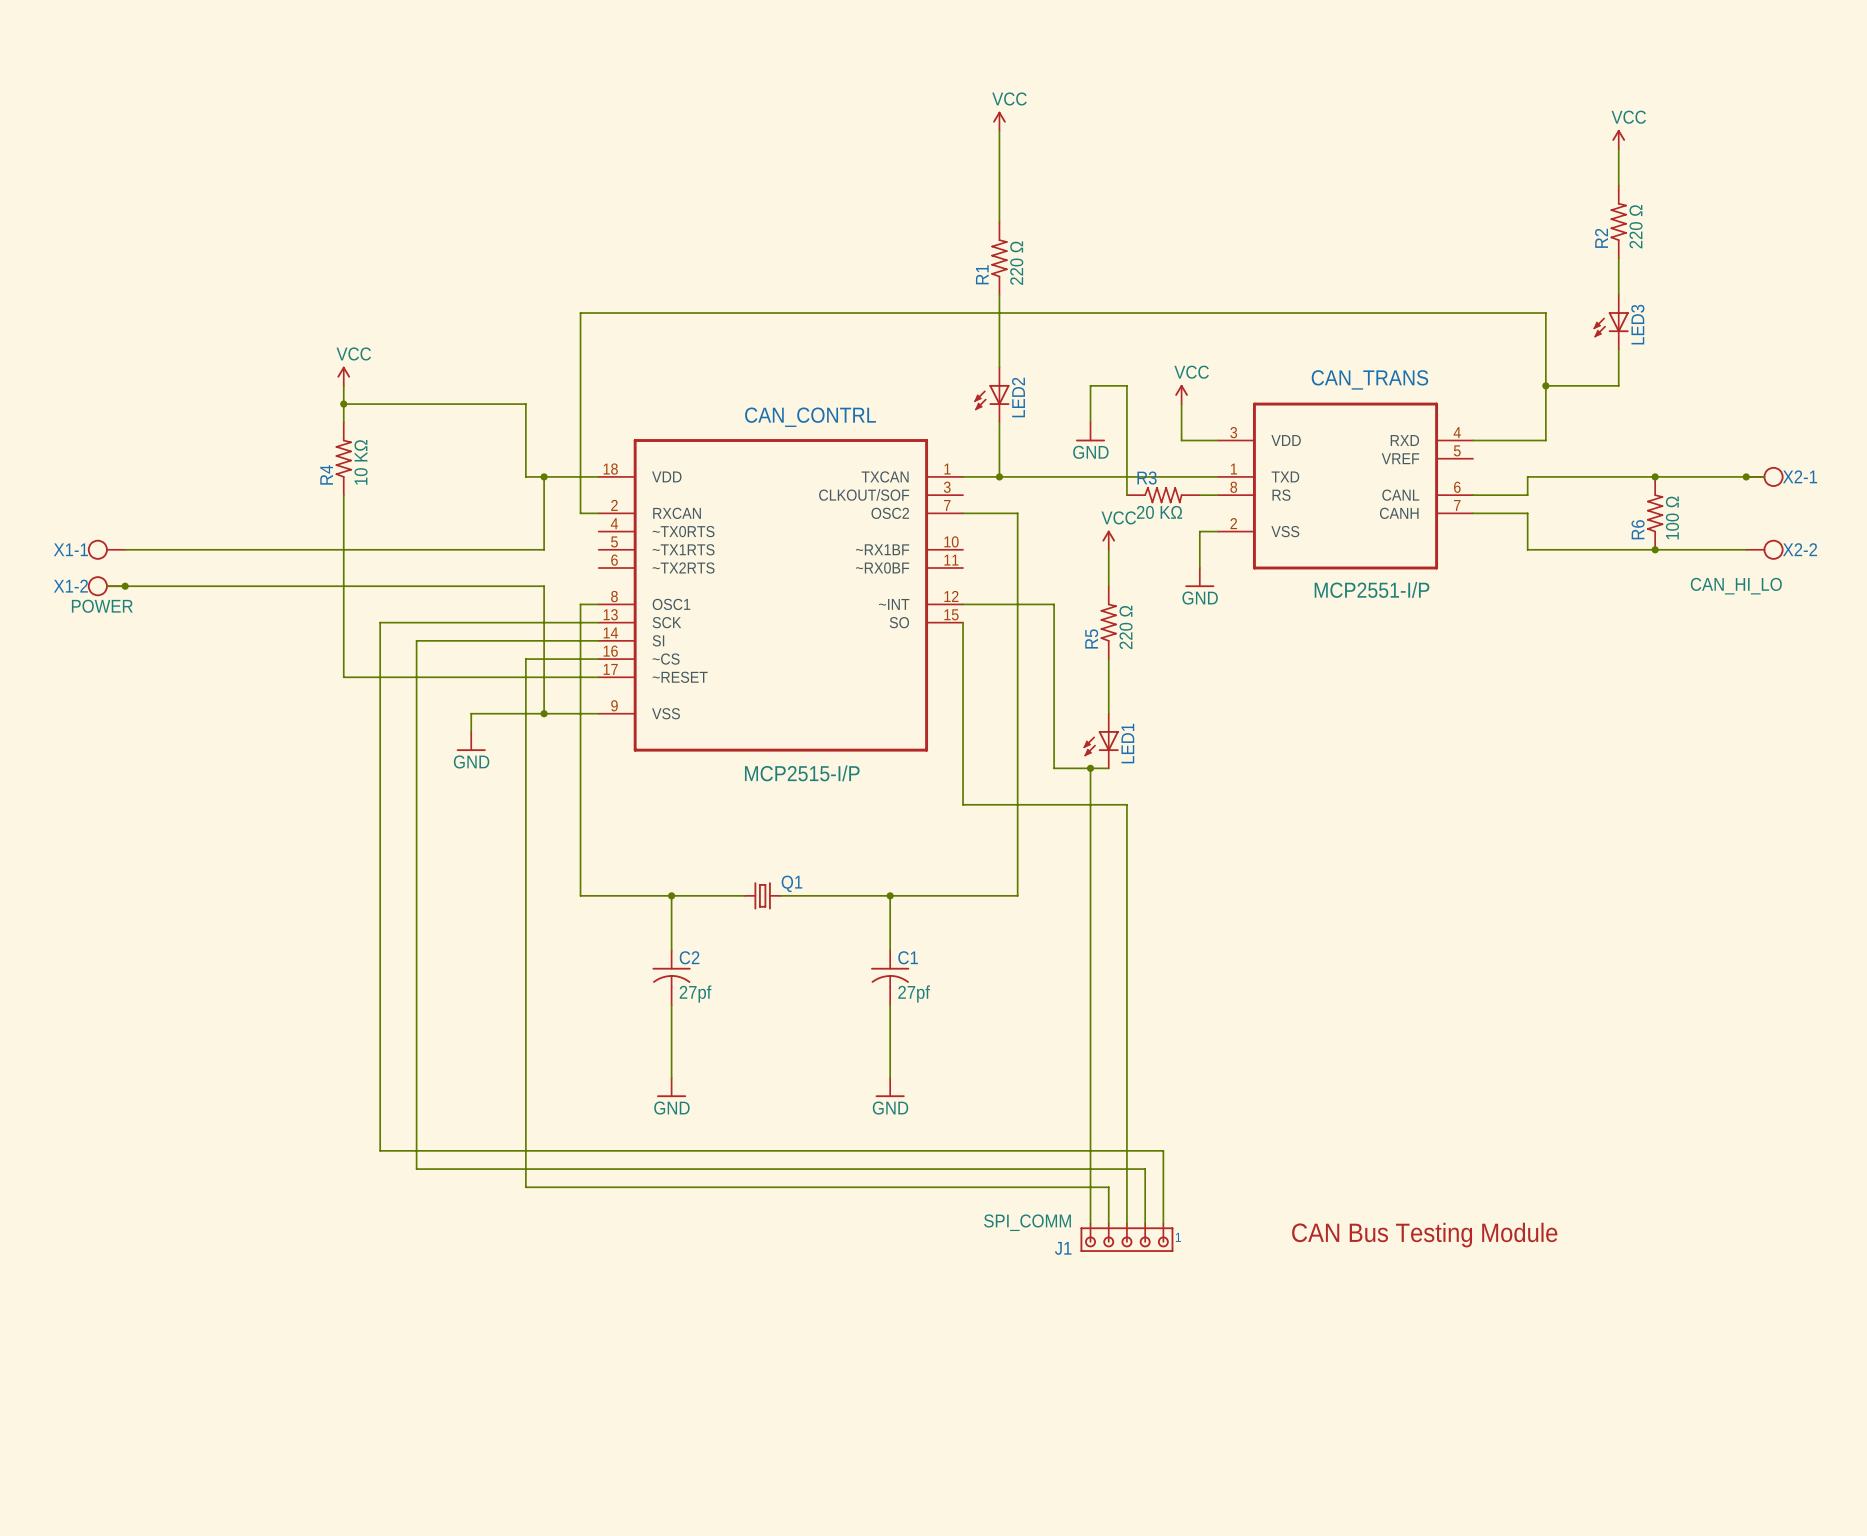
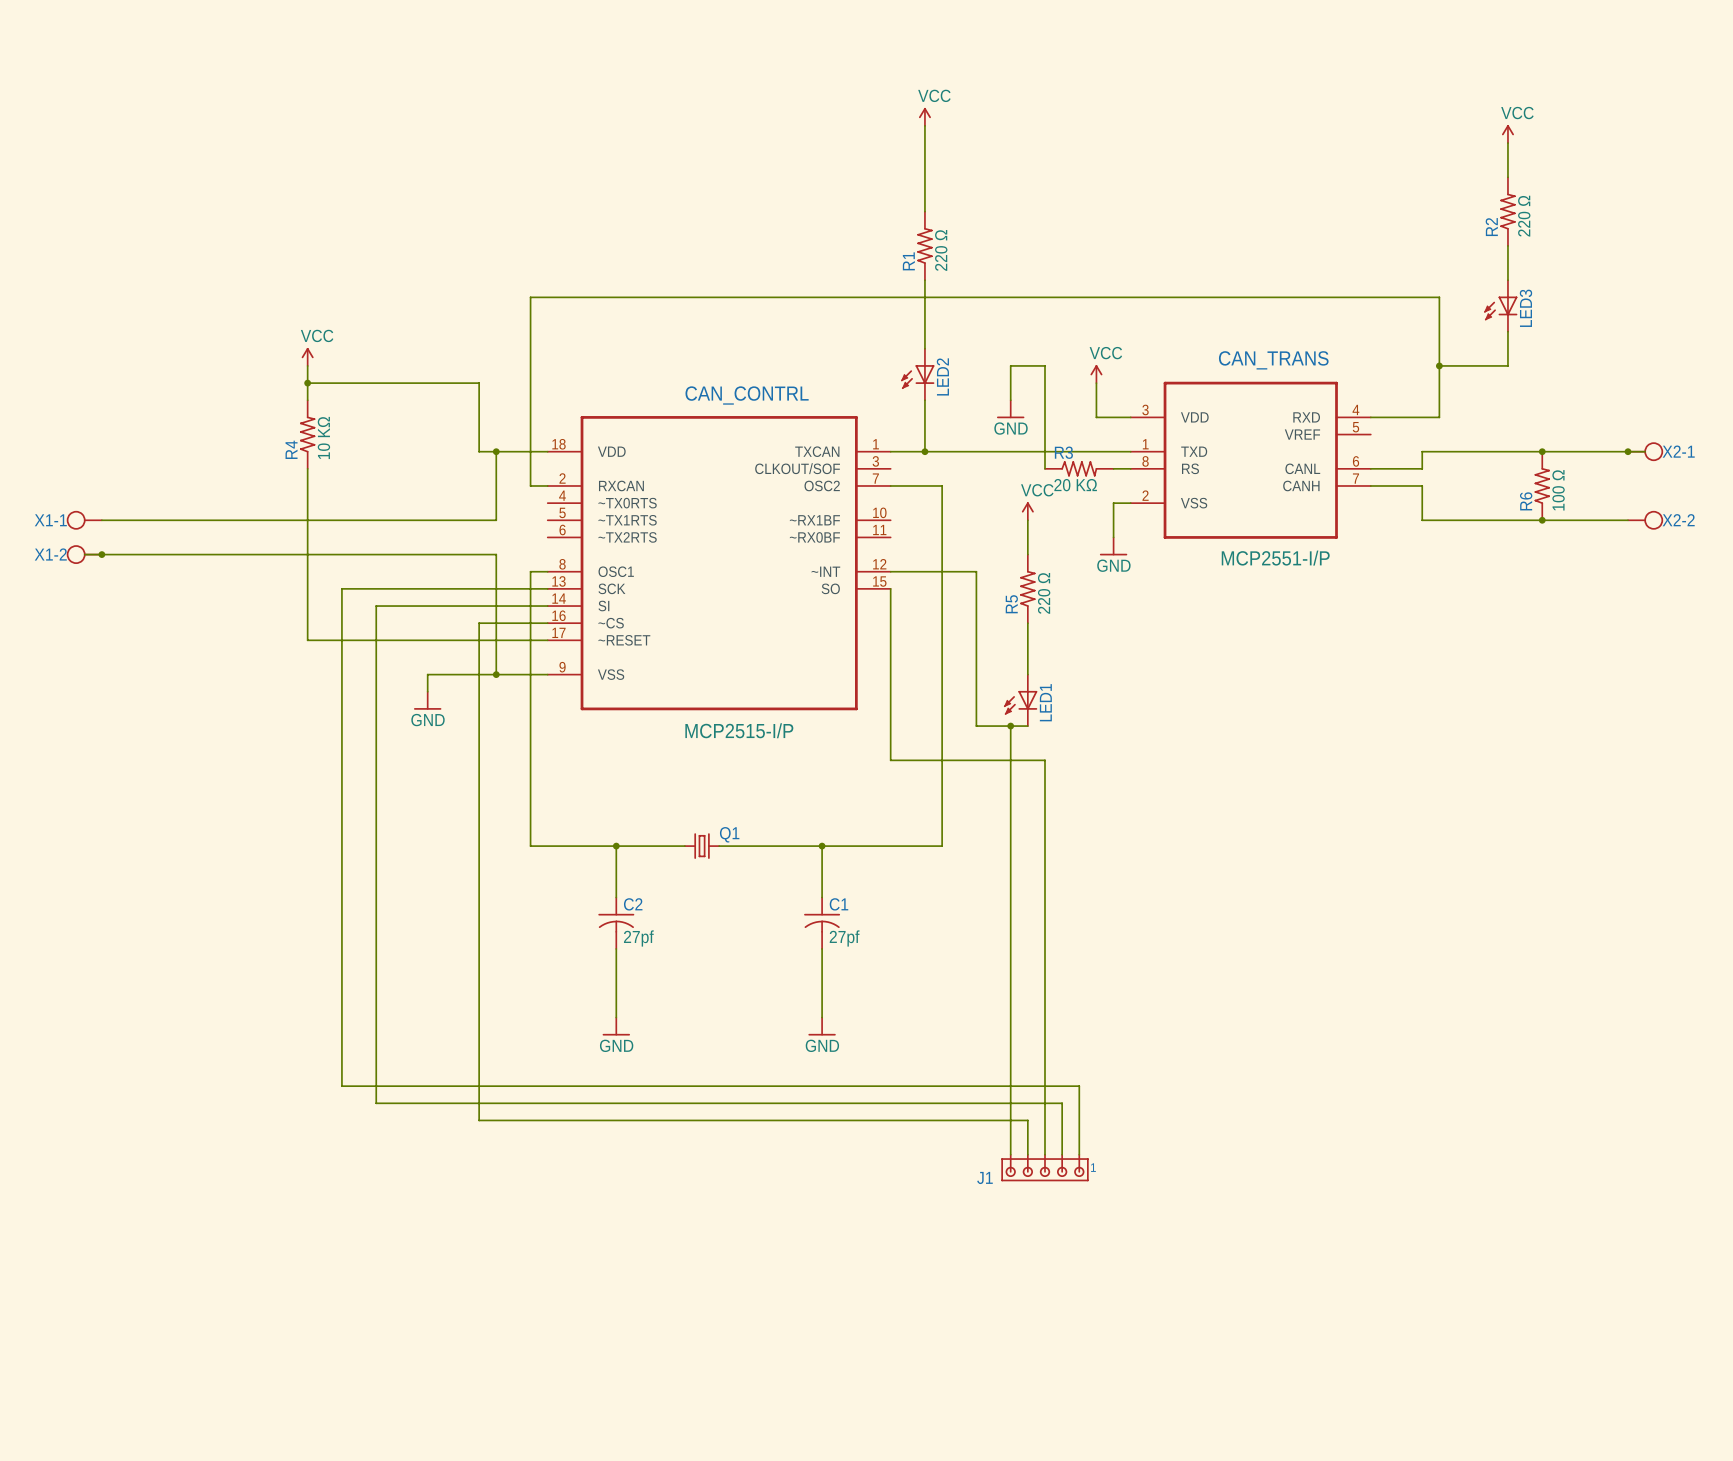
X2-2 value: CAN_HI_LO (1736, 586) -> none
X1-2 value: POWER (102, 606) -> none
J1 value: SPI_COMM (1027, 1222) -> none
text: CAN Bus Testing Module (1424, 1235) -> none

